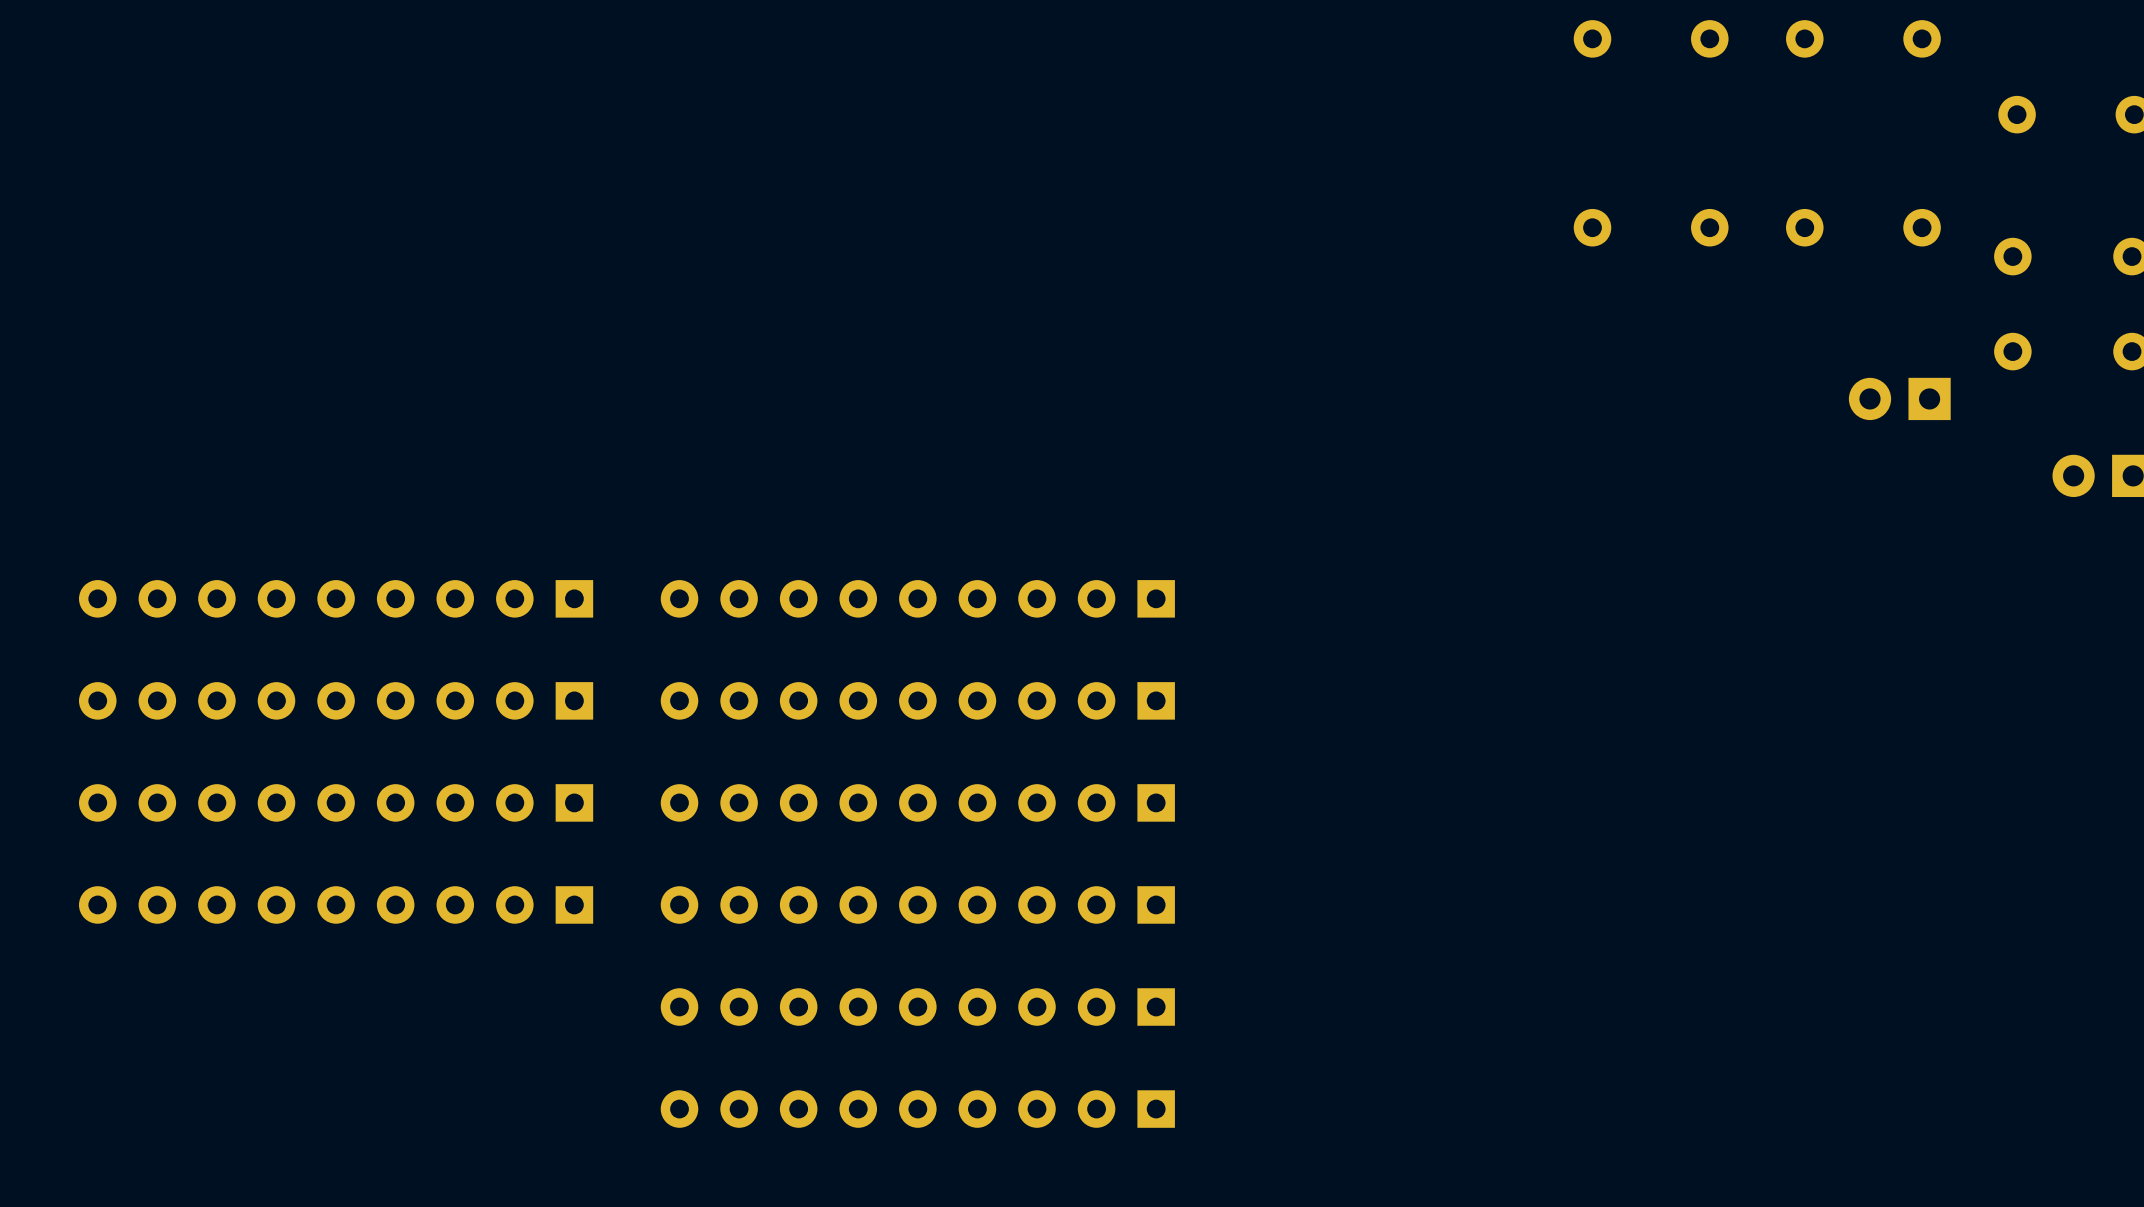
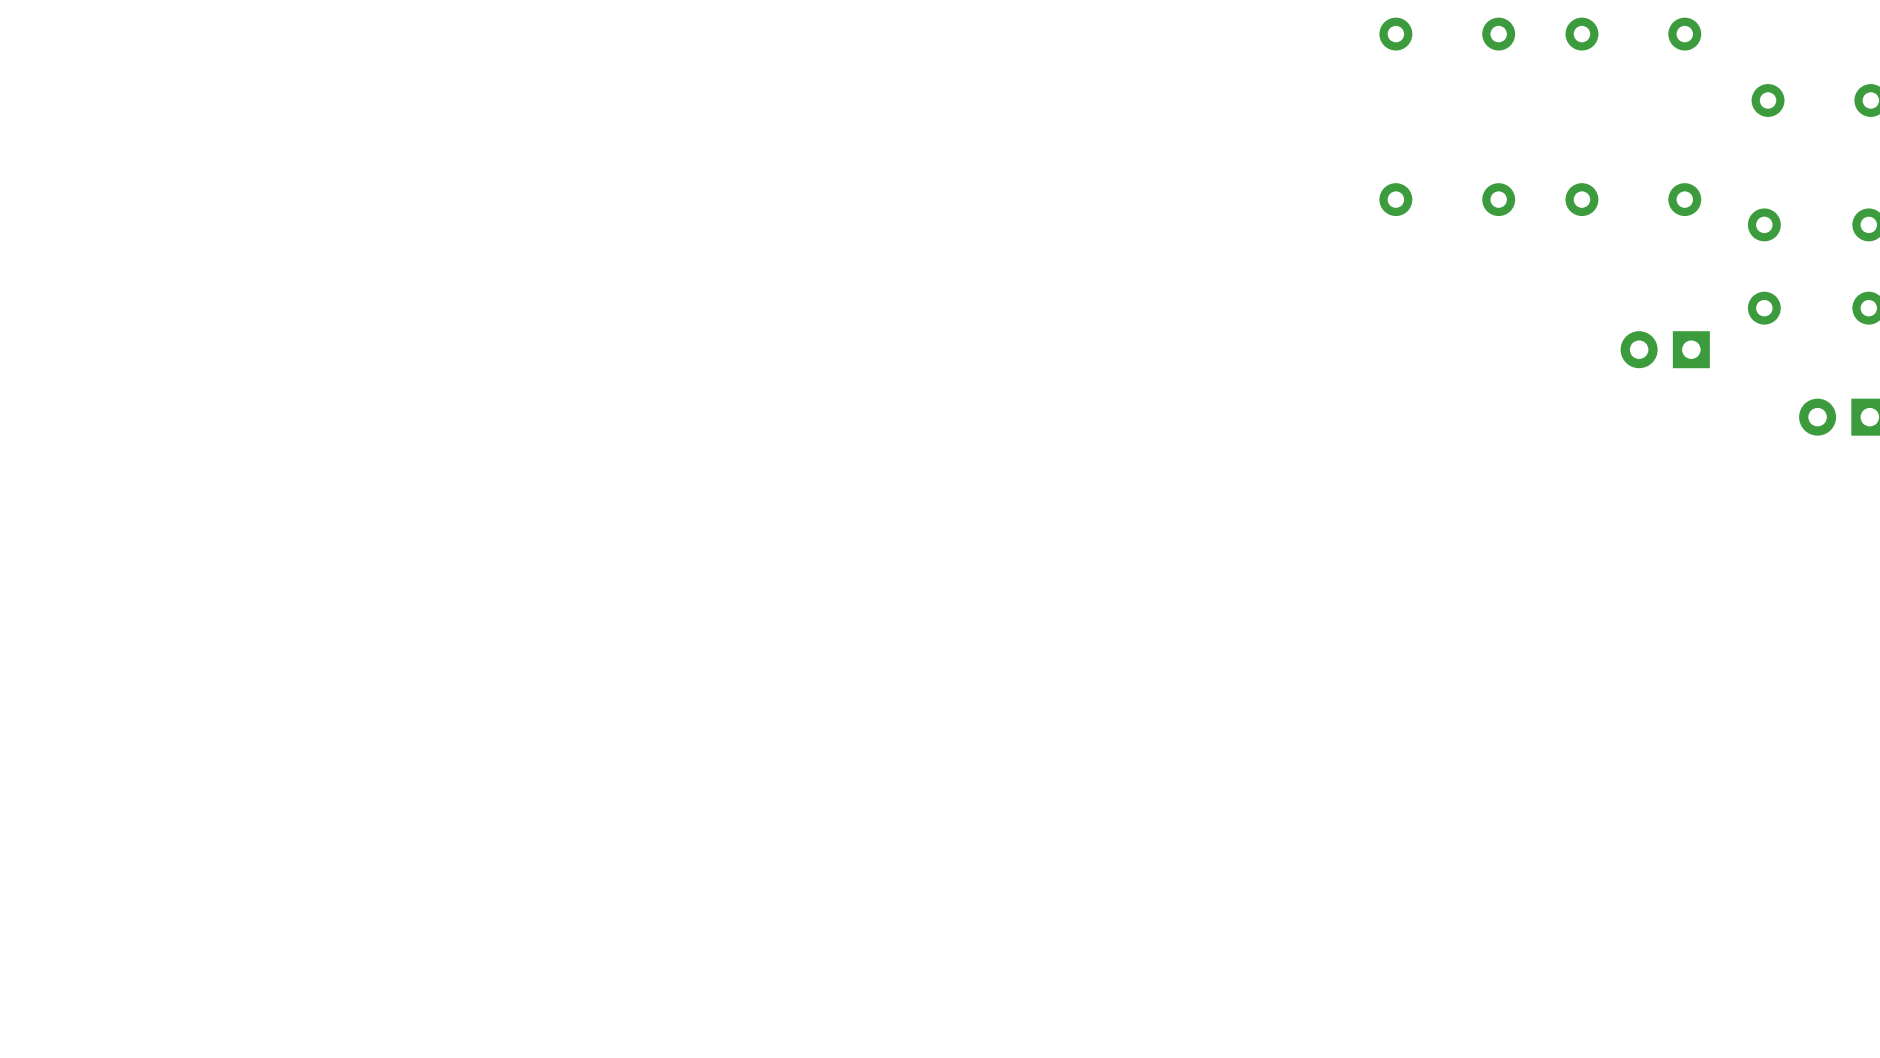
part: (336, 598) -> none
part: (917, 598) -> none
part: (336, 700) -> none
part: (917, 700) -> none
part: (336, 802) -> none
part: (917, 802) -> none
part: (336, 904) -> none
part: (917, 904) -> none
part: (917, 1007) -> none
part: (917, 1109) -> none

